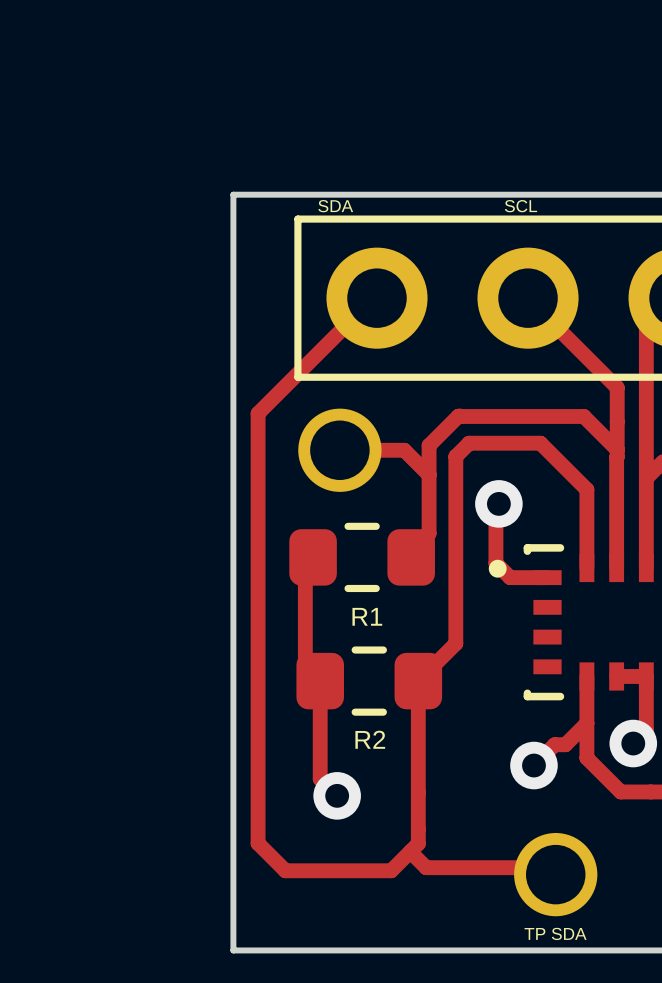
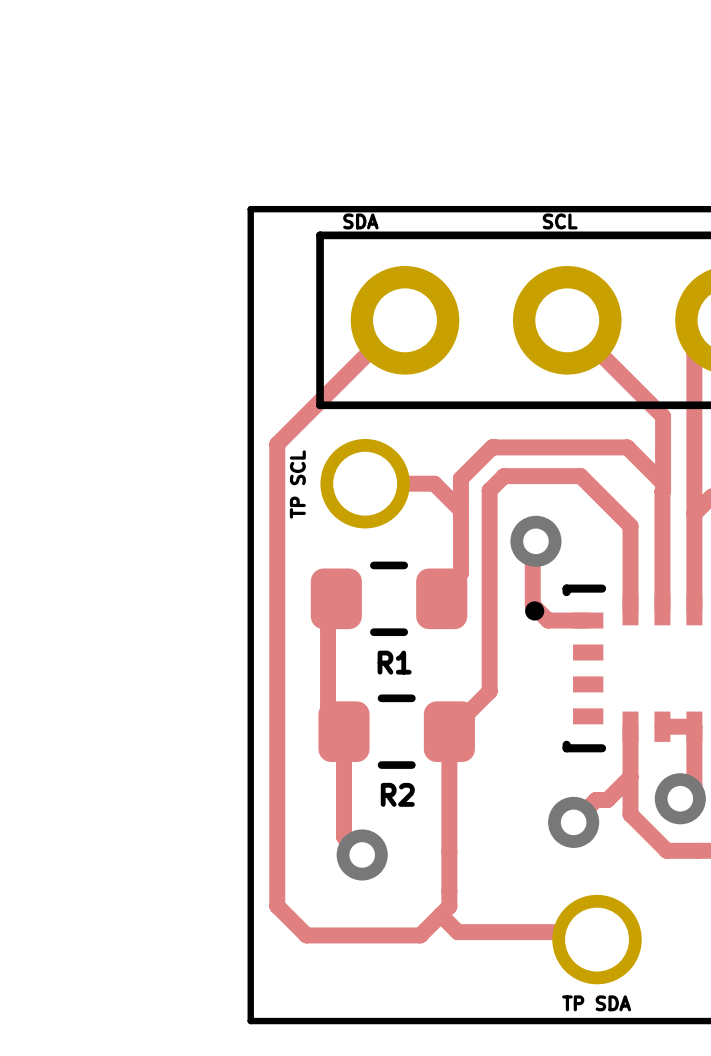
text: none -> TP SCL (297, 484)

